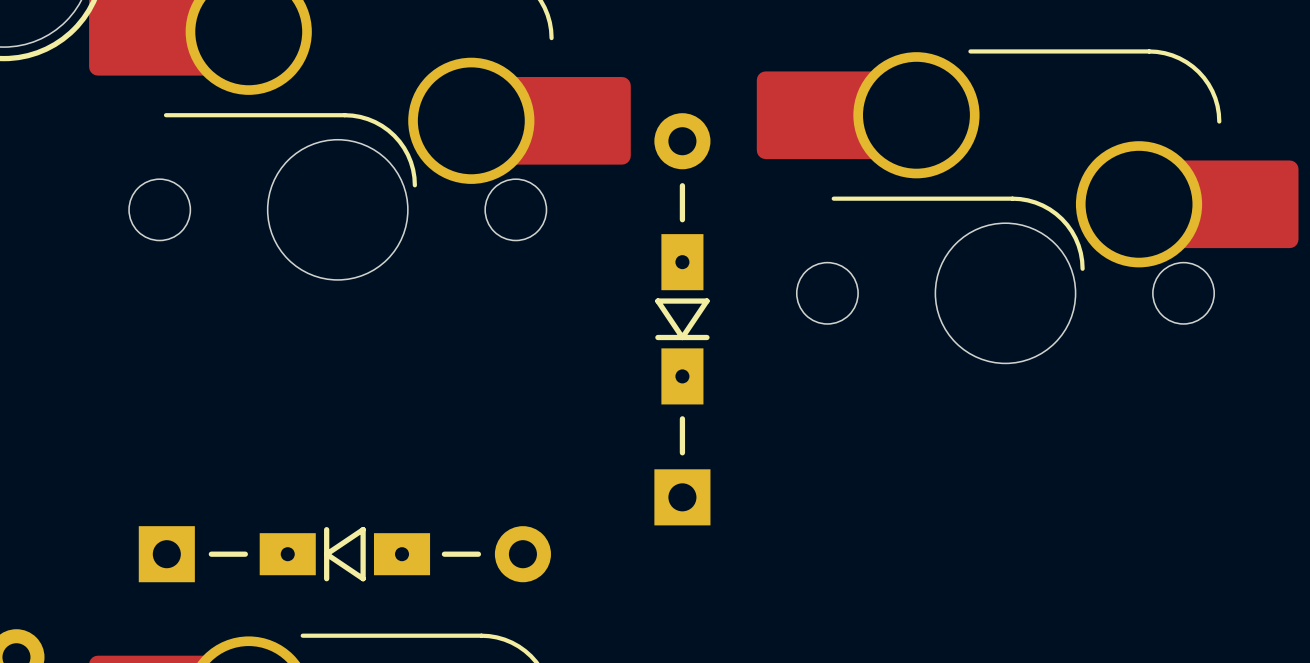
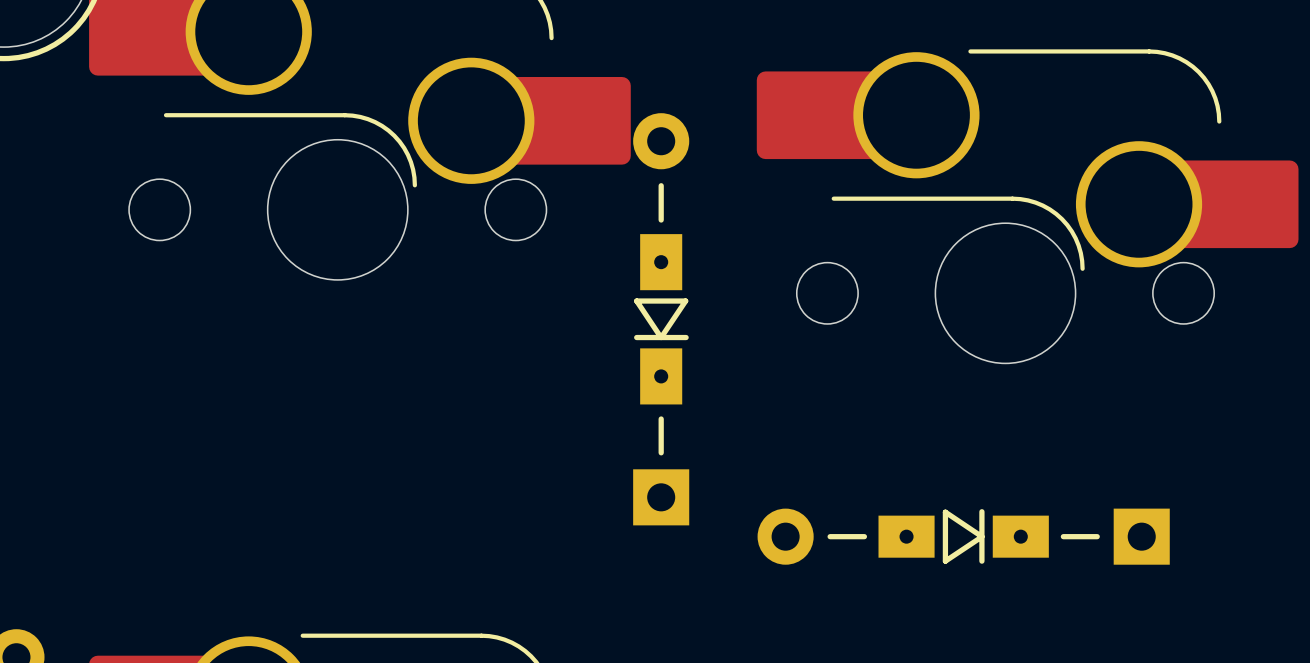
part side: top (682, 319) -> bottom (661, 319)
part side: top (344, 554) -> bottom (963, 536)

